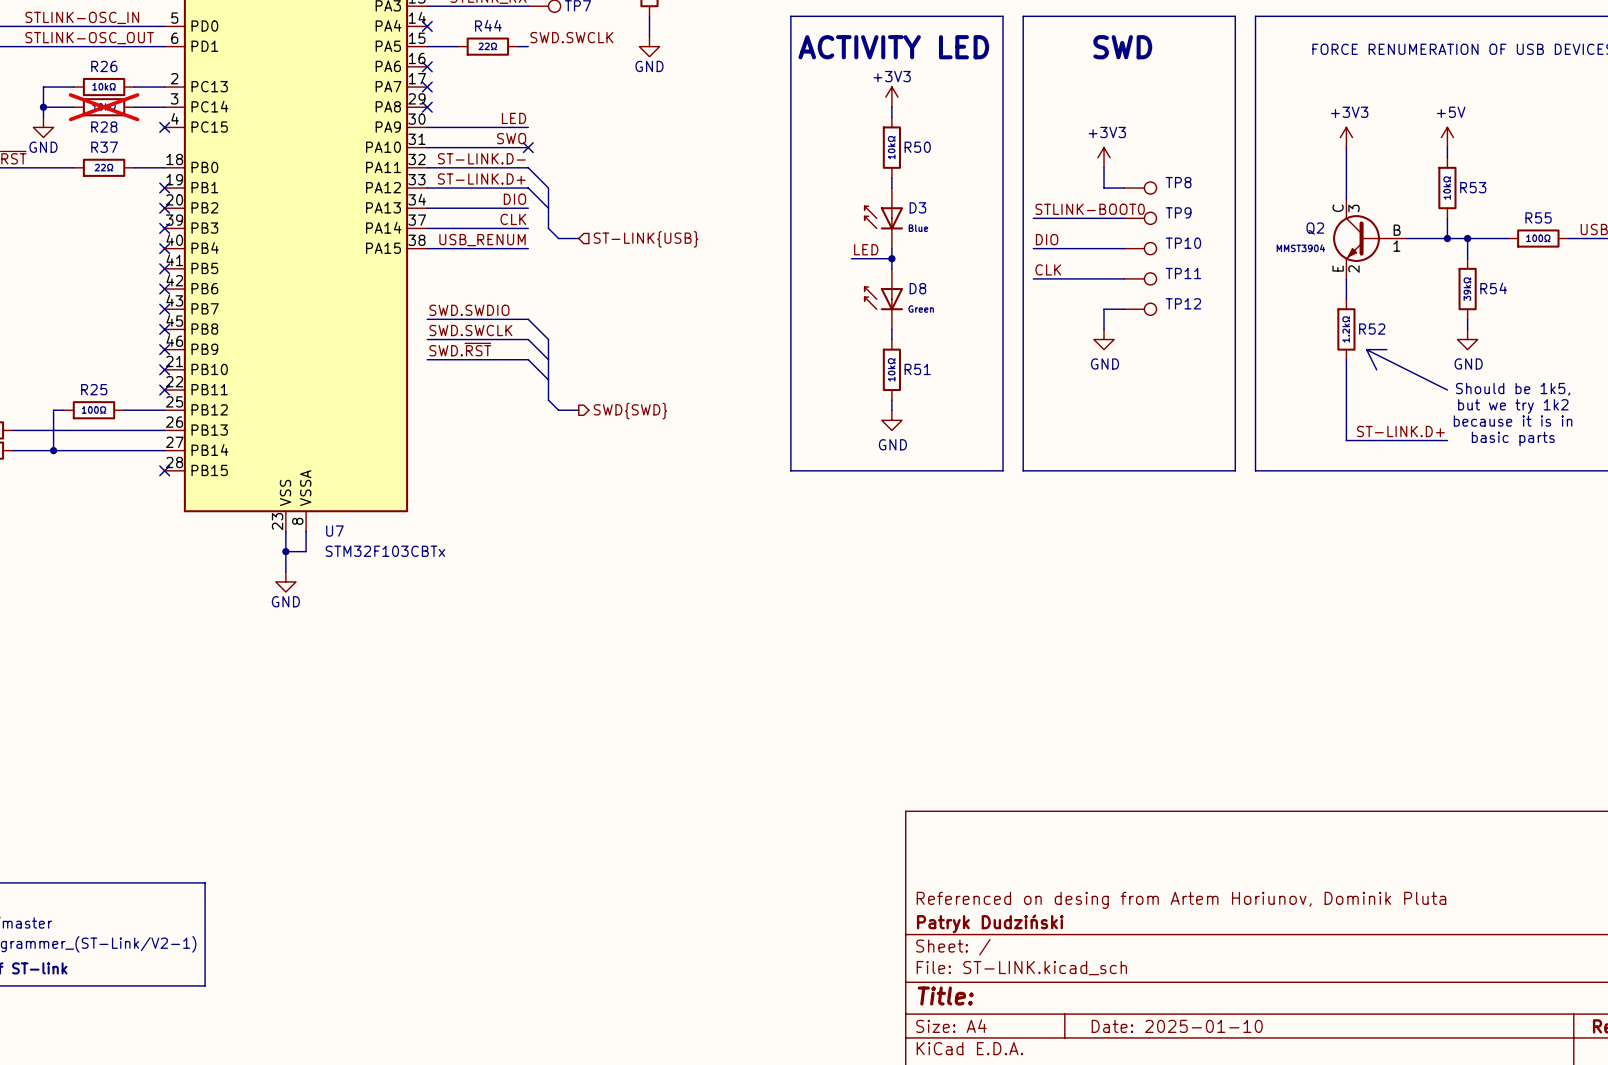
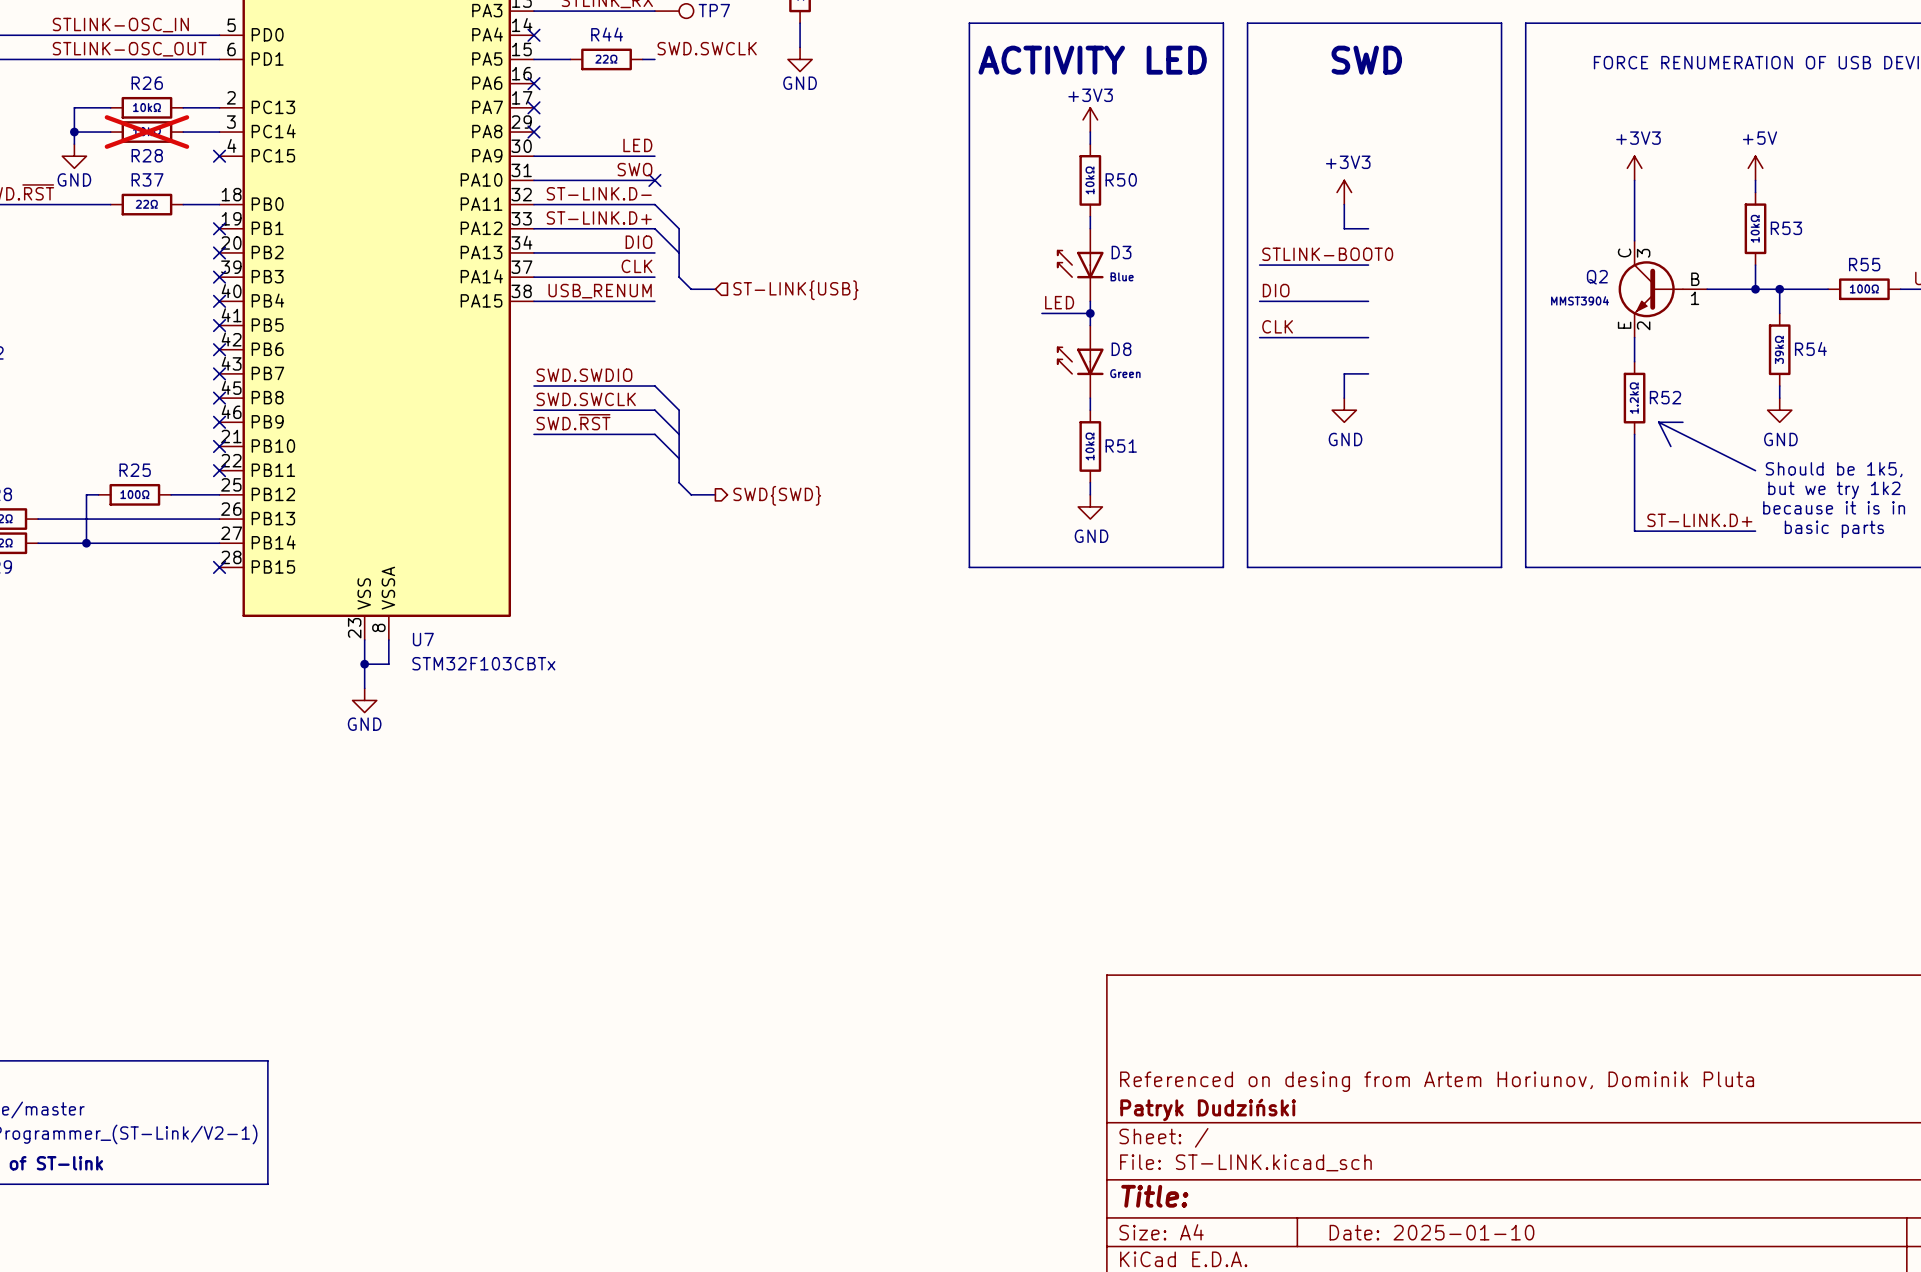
TP8: (1140, 188) -> none
TP9: (1140, 218) -> none
TP10: (1140, 248) -> none
TP11: (1140, 278) -> none
TP12: (1140, 309) -> none

